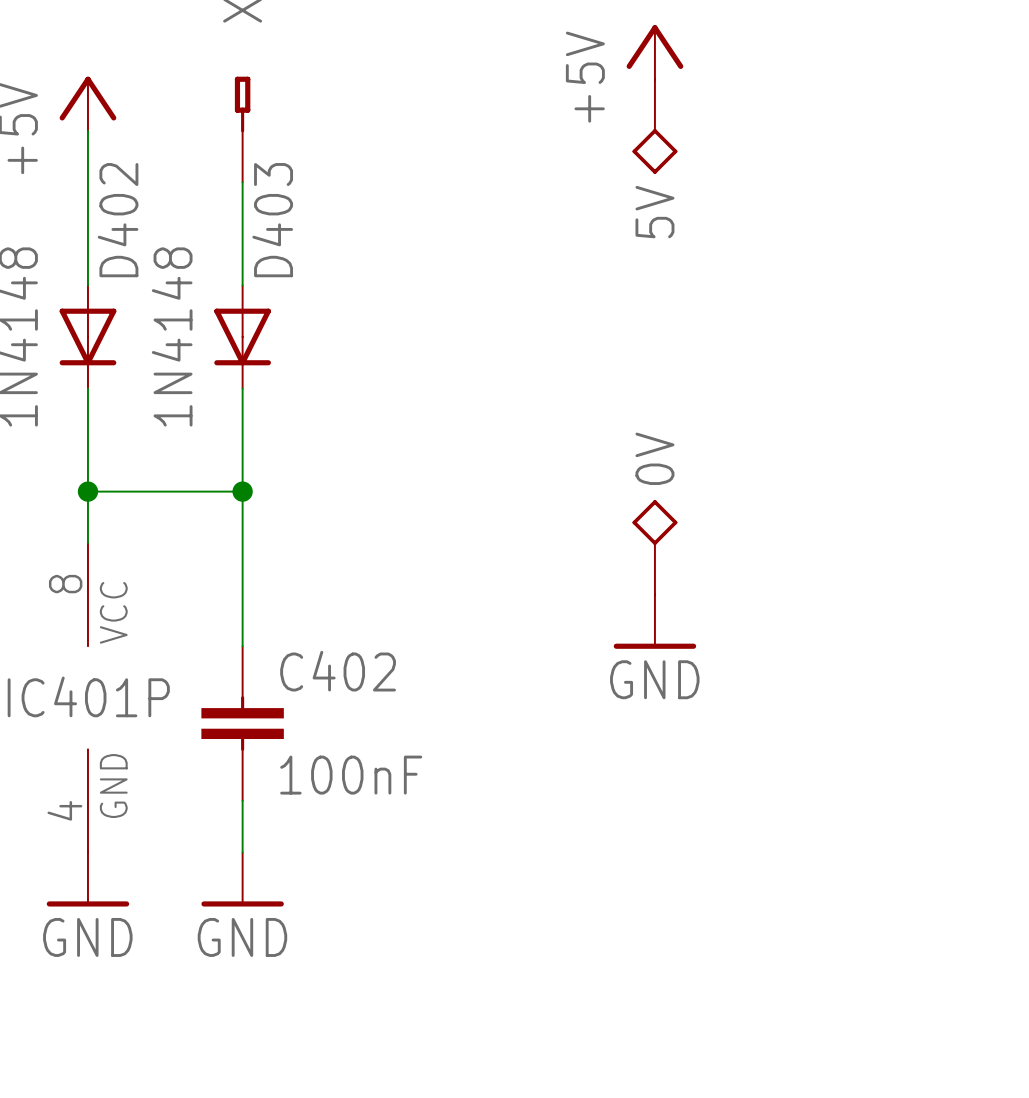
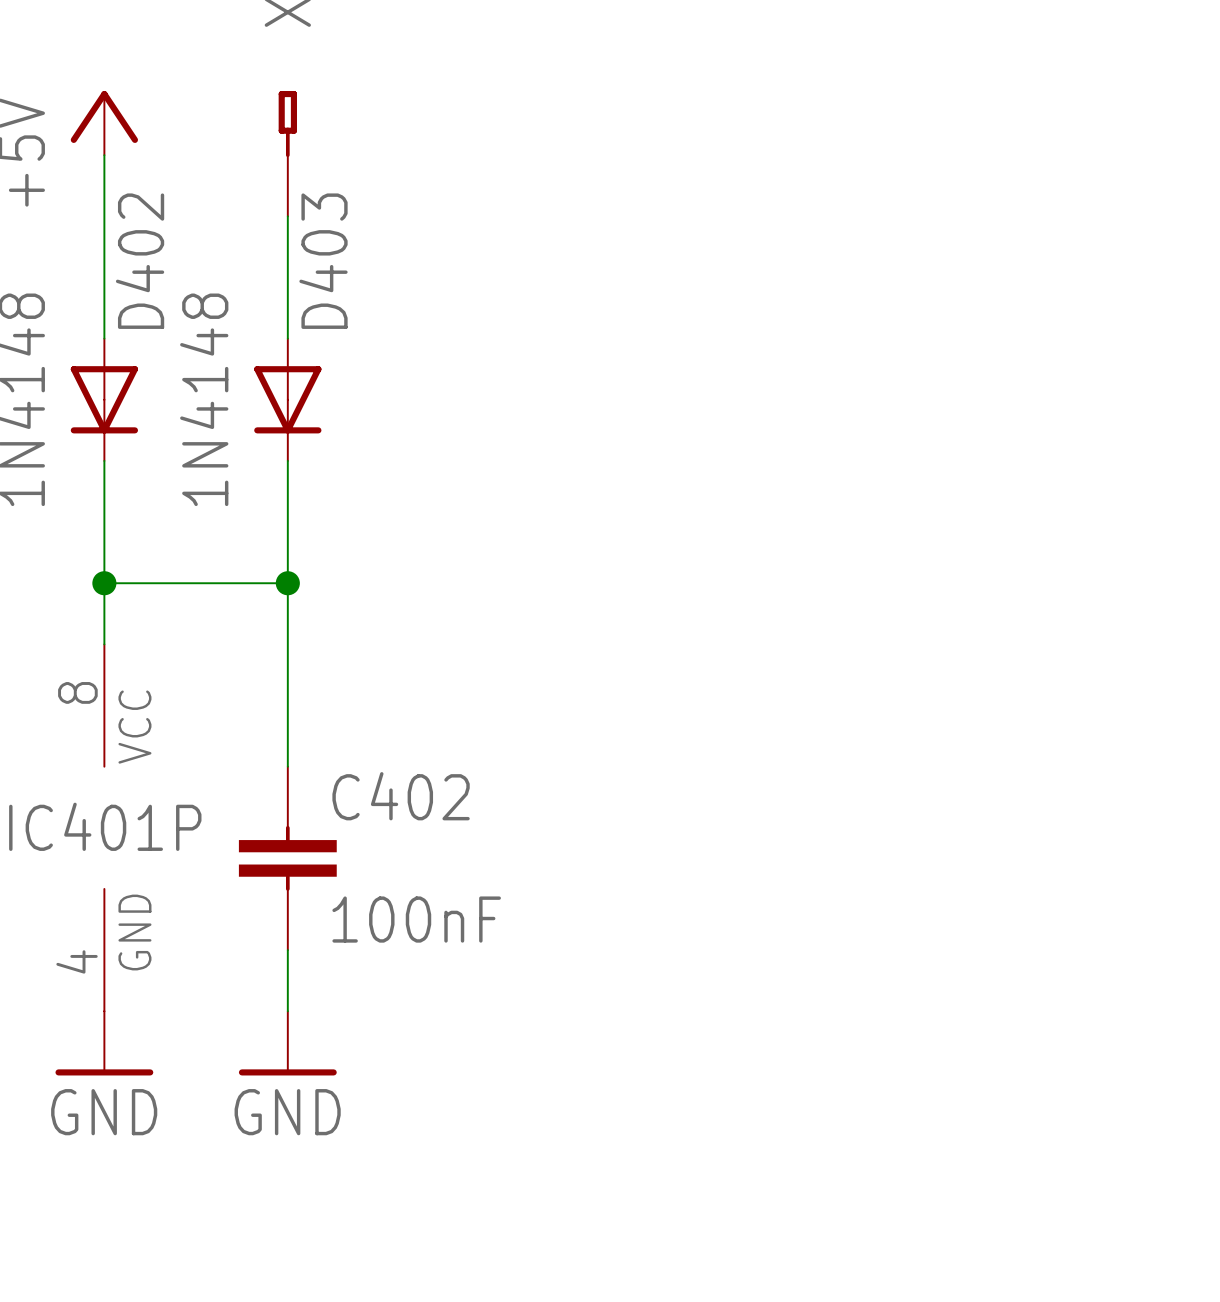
power symbol: +5V (654, 52) -> none
5V: (654, 126) -> none
0V: (654, 547) -> none
power symbol: GND (654, 621) -> none

